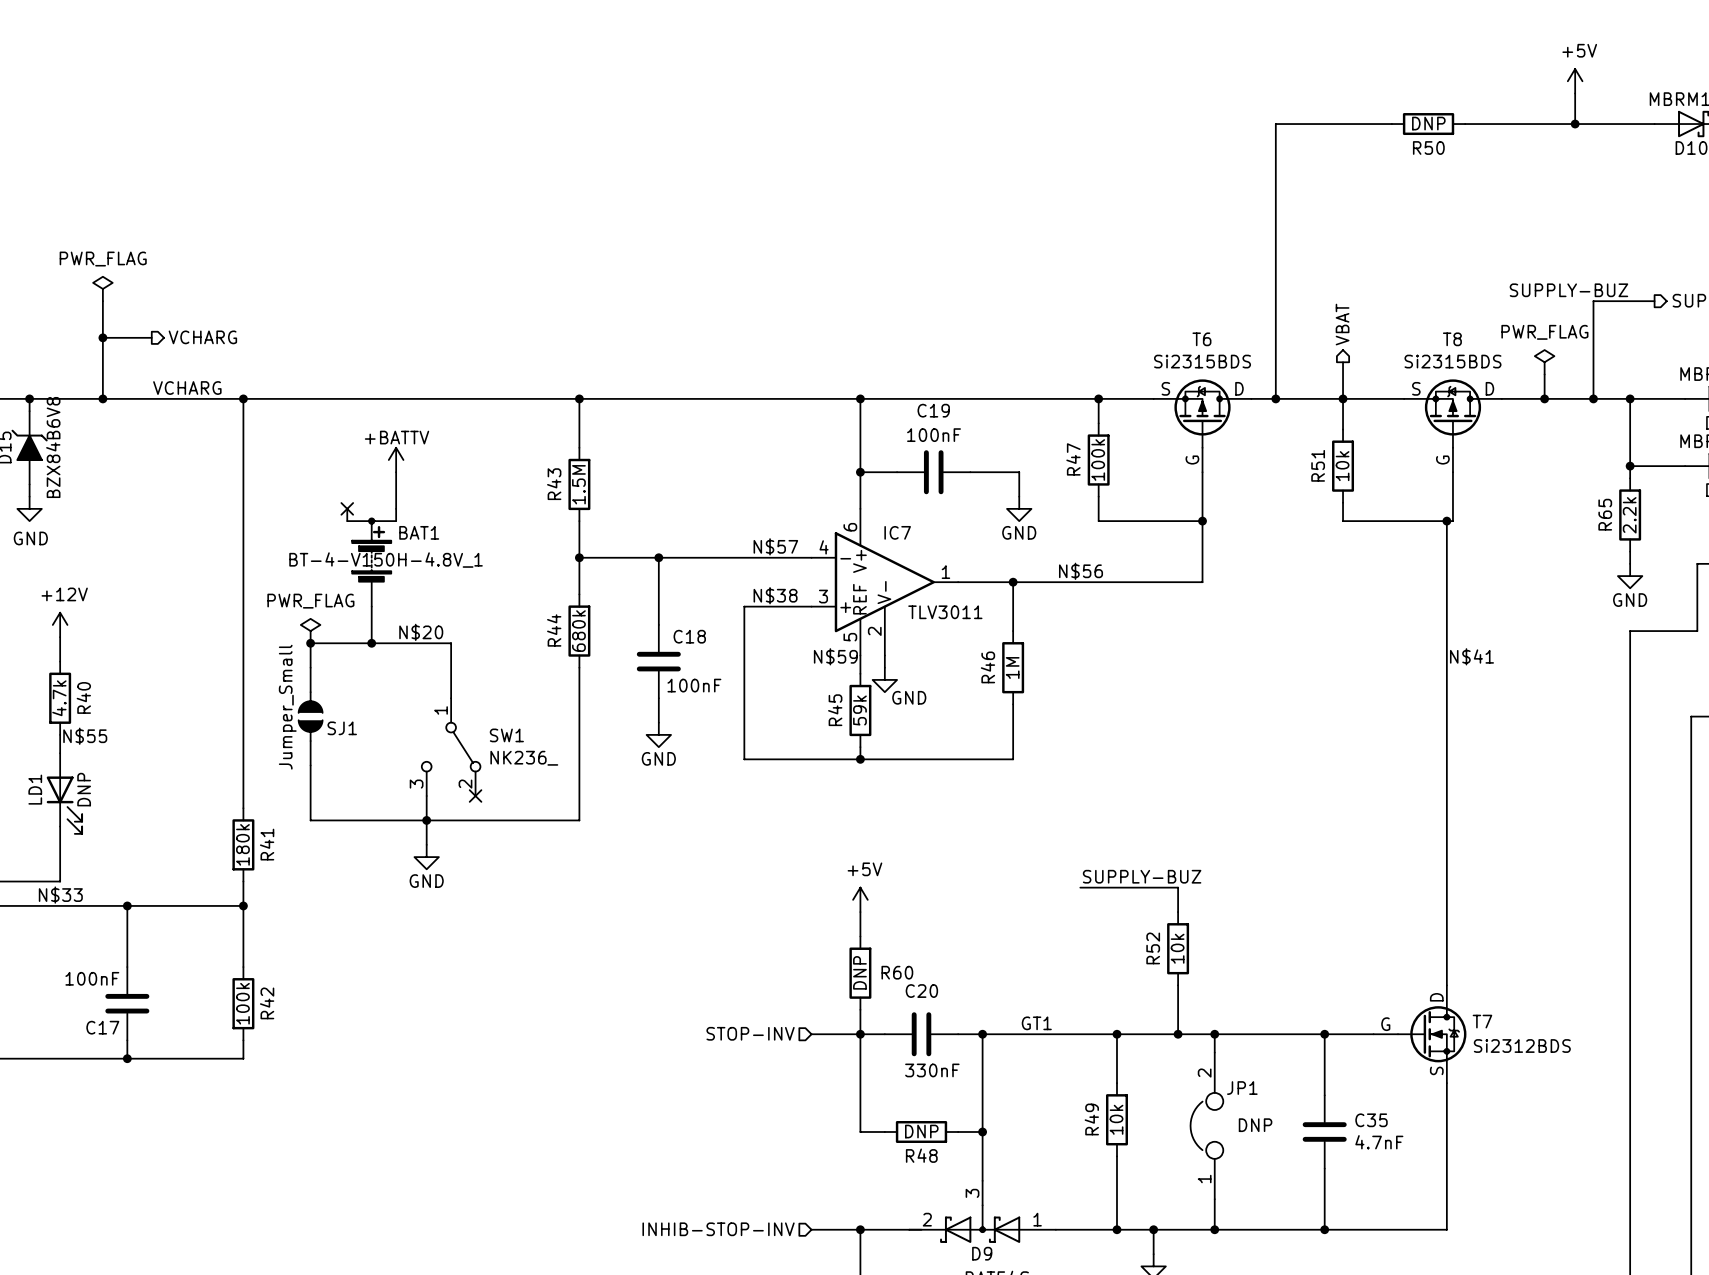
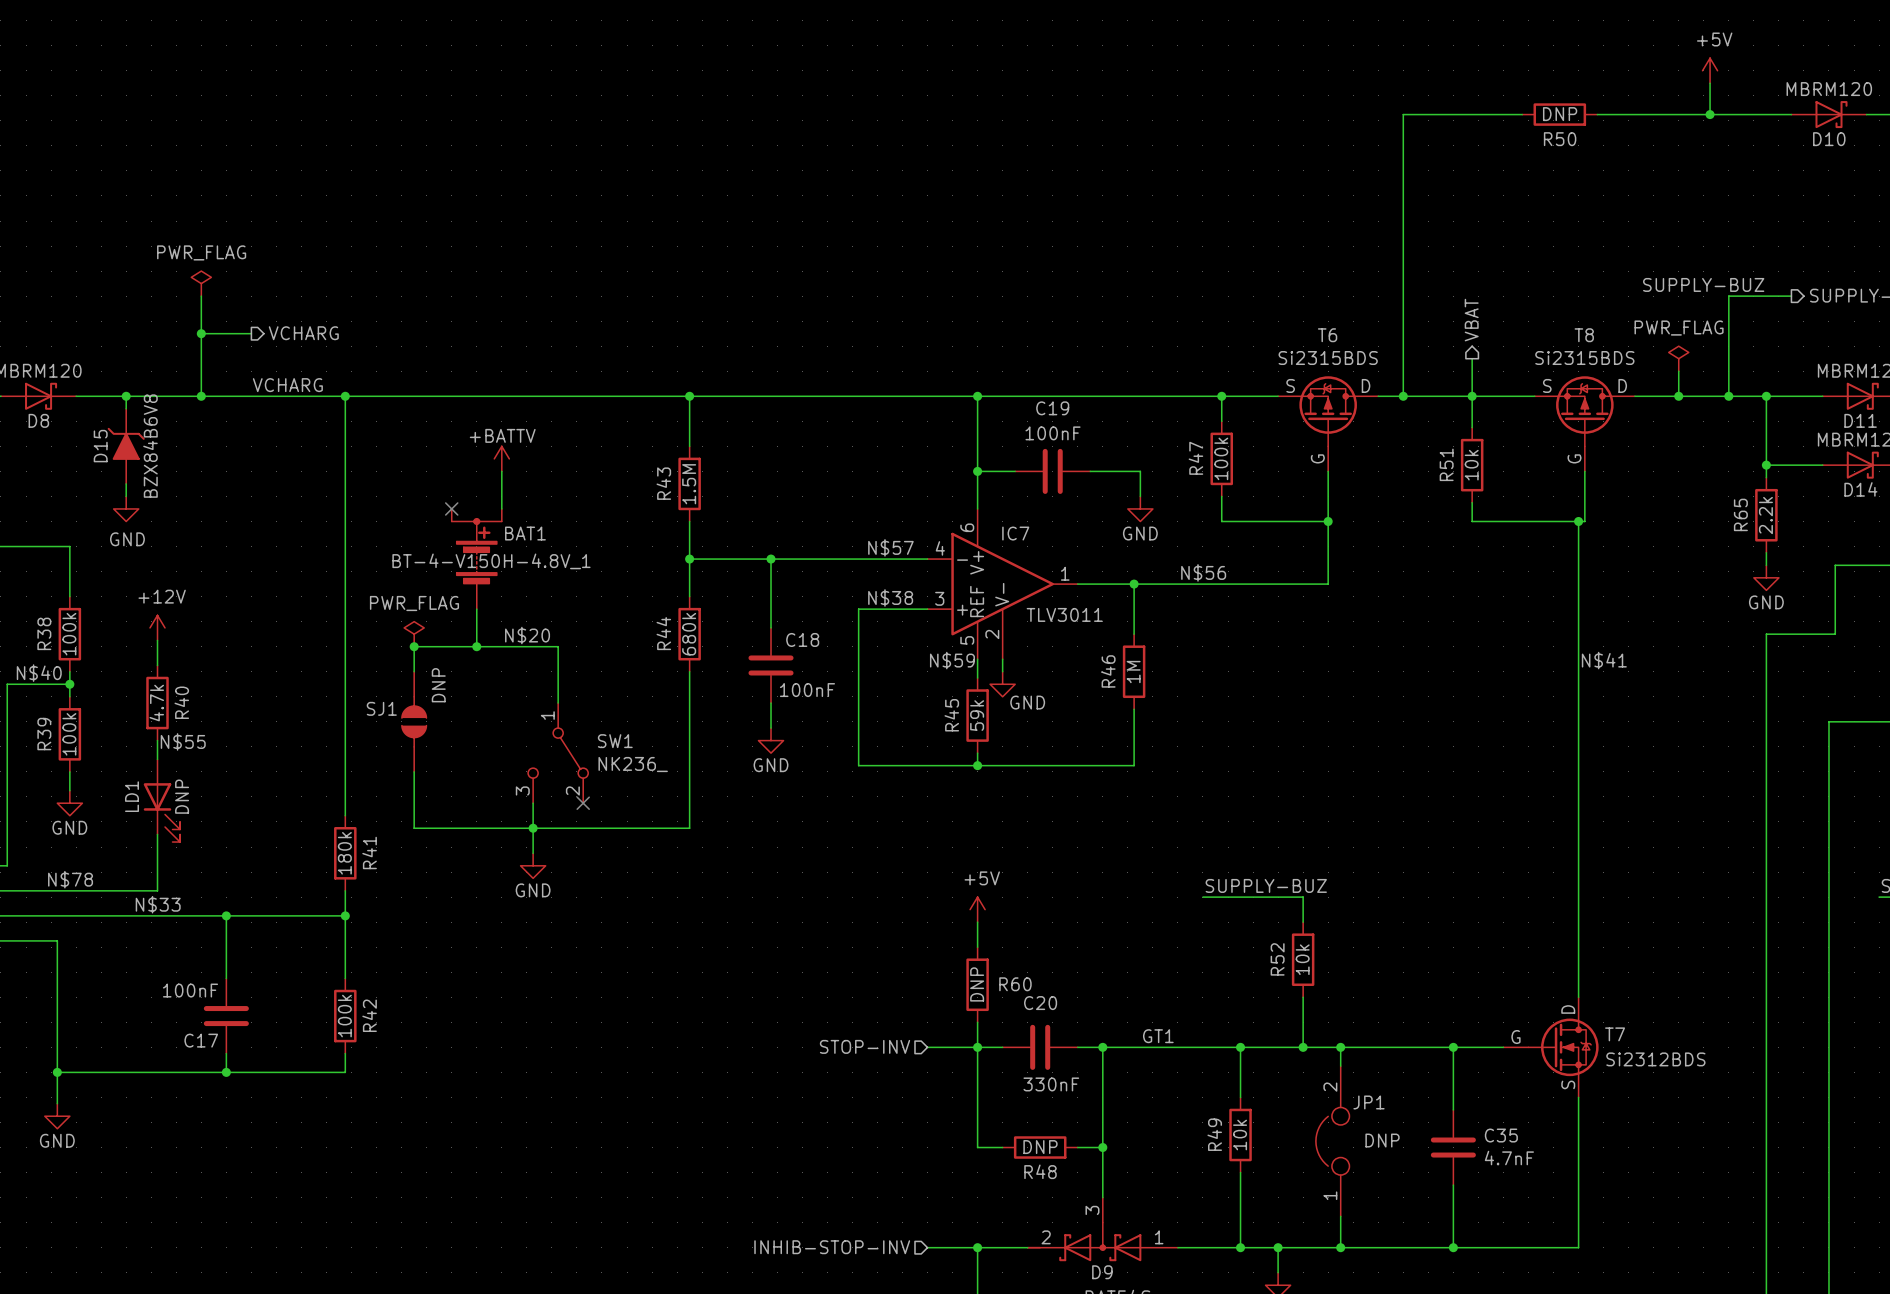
SJ1 value: Jumper_Small (287, 707) -> DNP (438, 685)
SJ1 name position: SJ1 (342, 728) -> SJ1 (381, 708)

